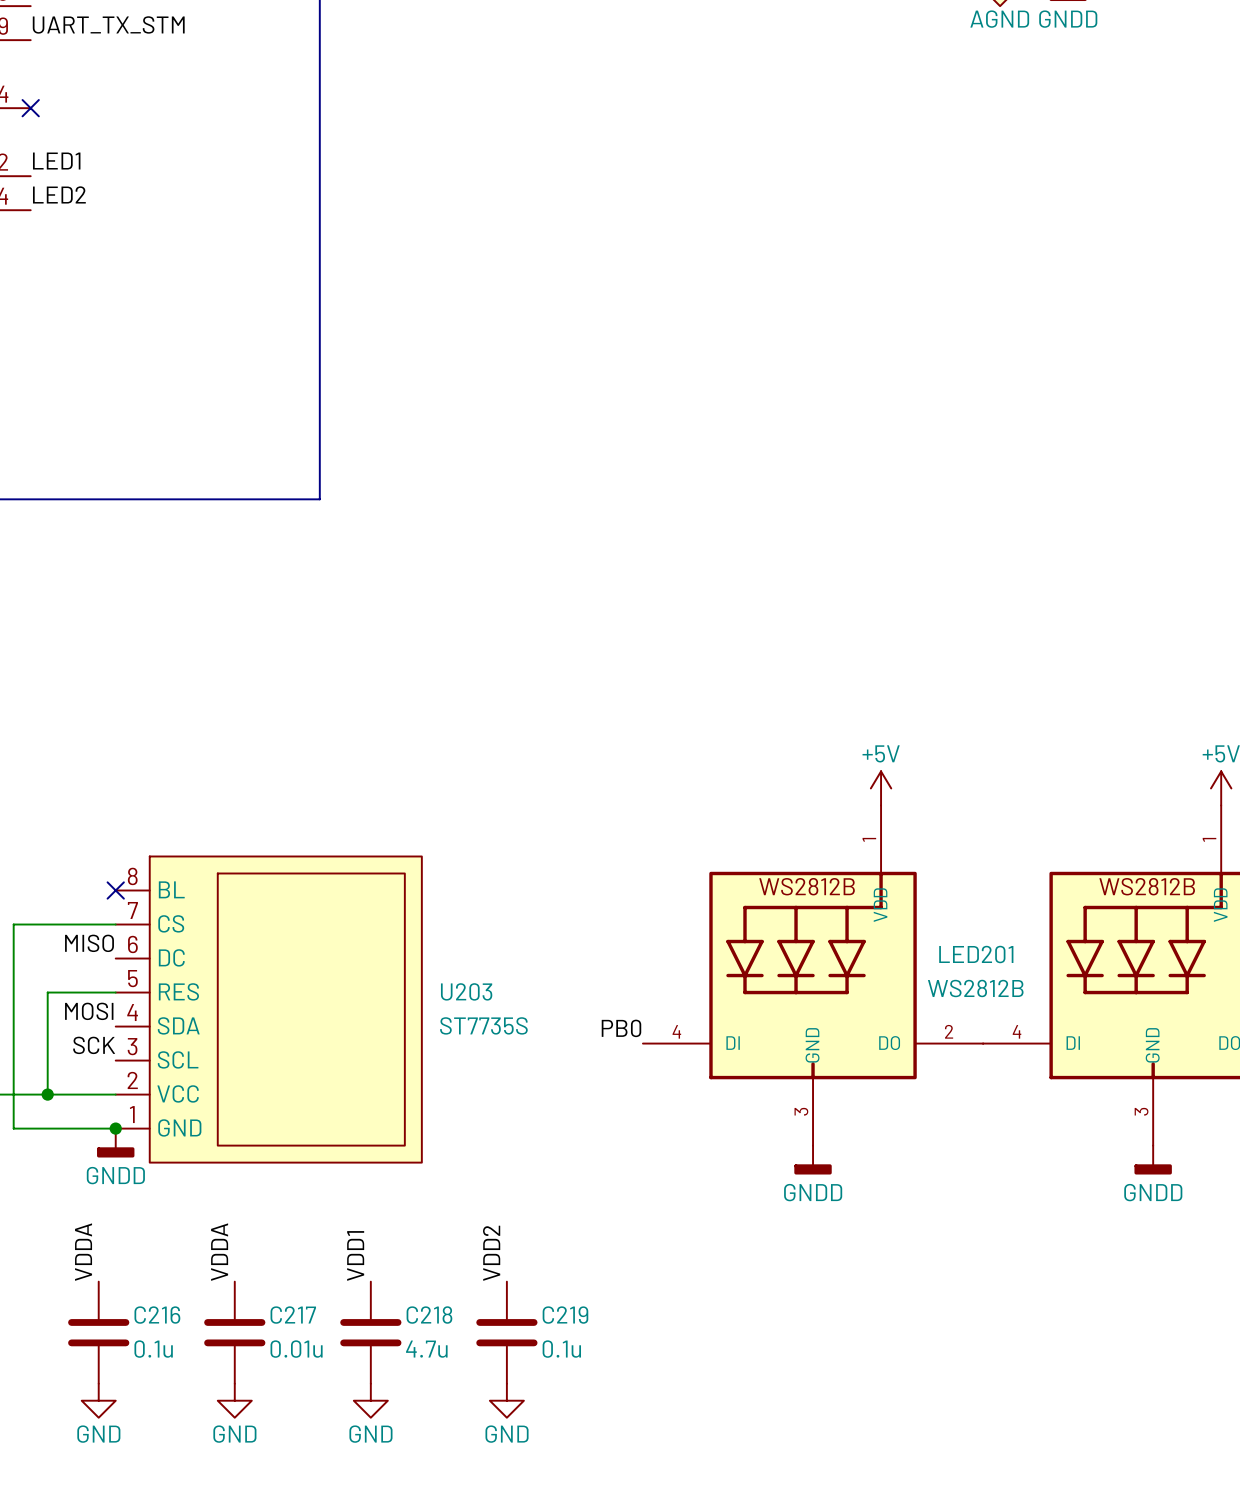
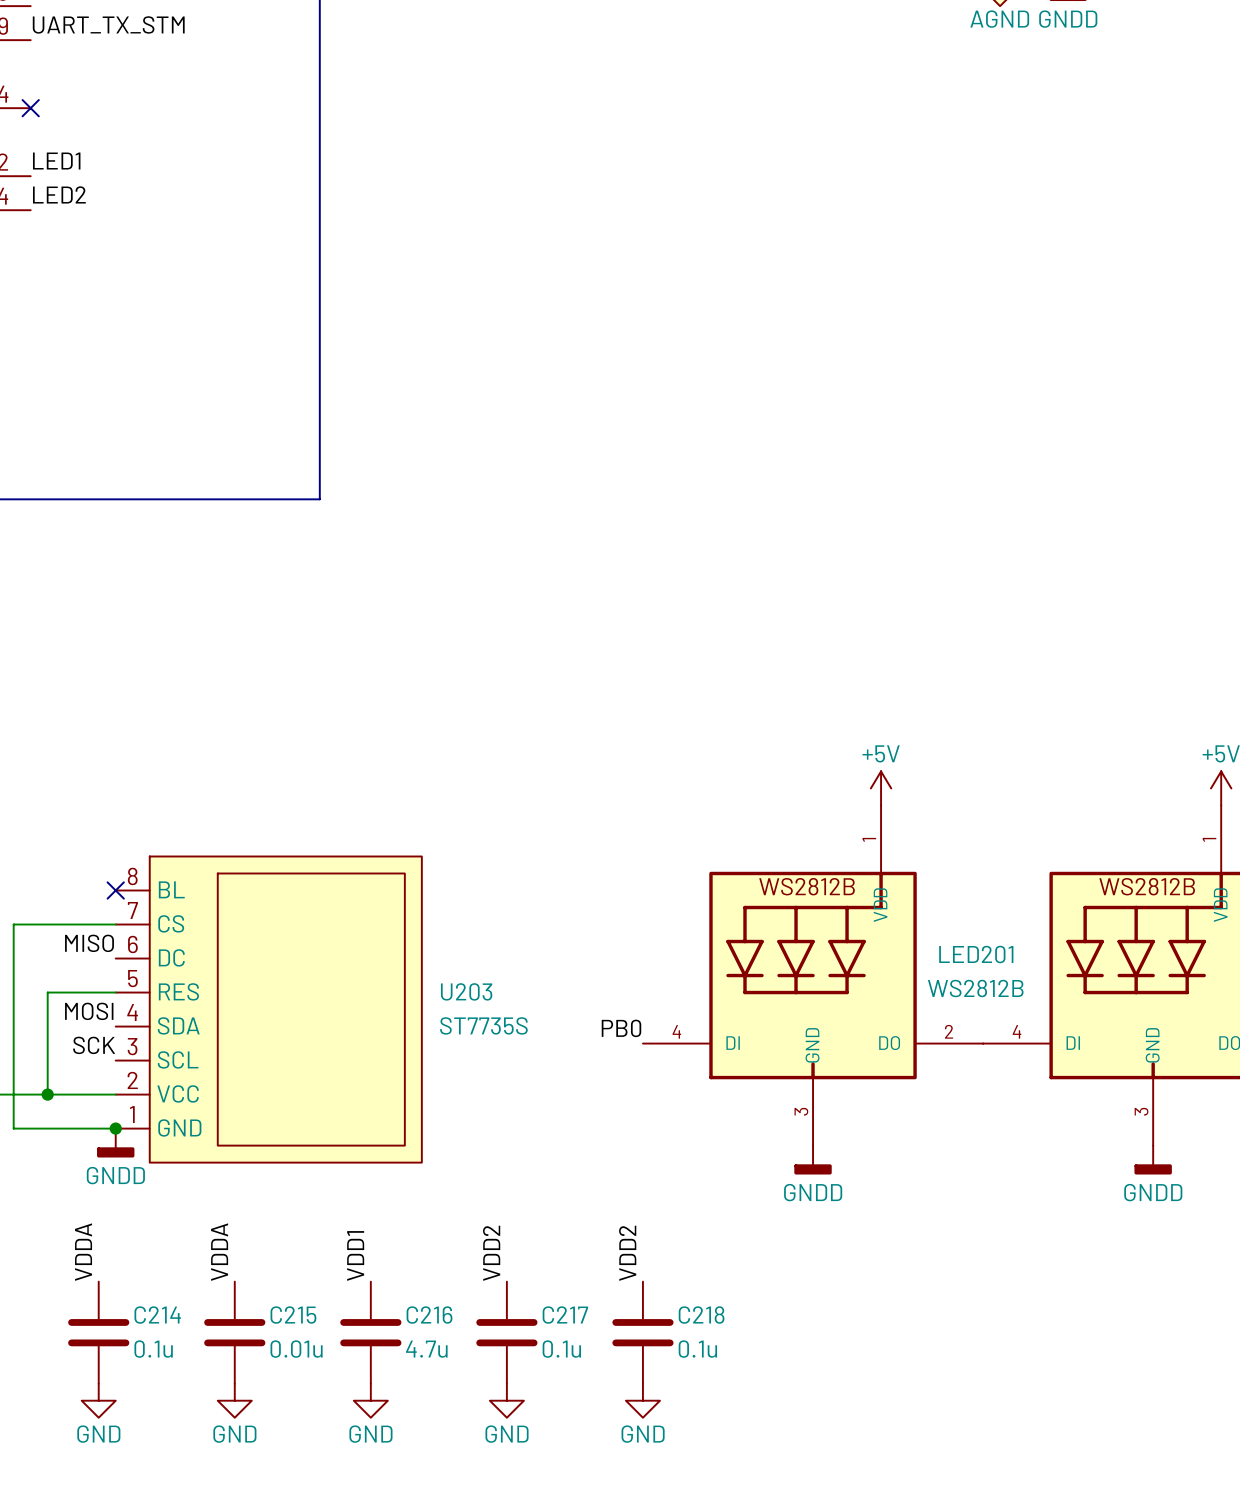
label: none -> VDD2 (627, 1253)
C216 name: C216 (157, 1315) -> C214 (157, 1315)
C217 name: C217 (293, 1315) -> C215 (293, 1315)
C218 name: C218 (429, 1315) -> C216 (429, 1315)
C219 name: C219 (565, 1315) -> C217 (565, 1315)
C218: none -> 0.1u (642, 1332)
power symbol: none -> GND (642, 1400)

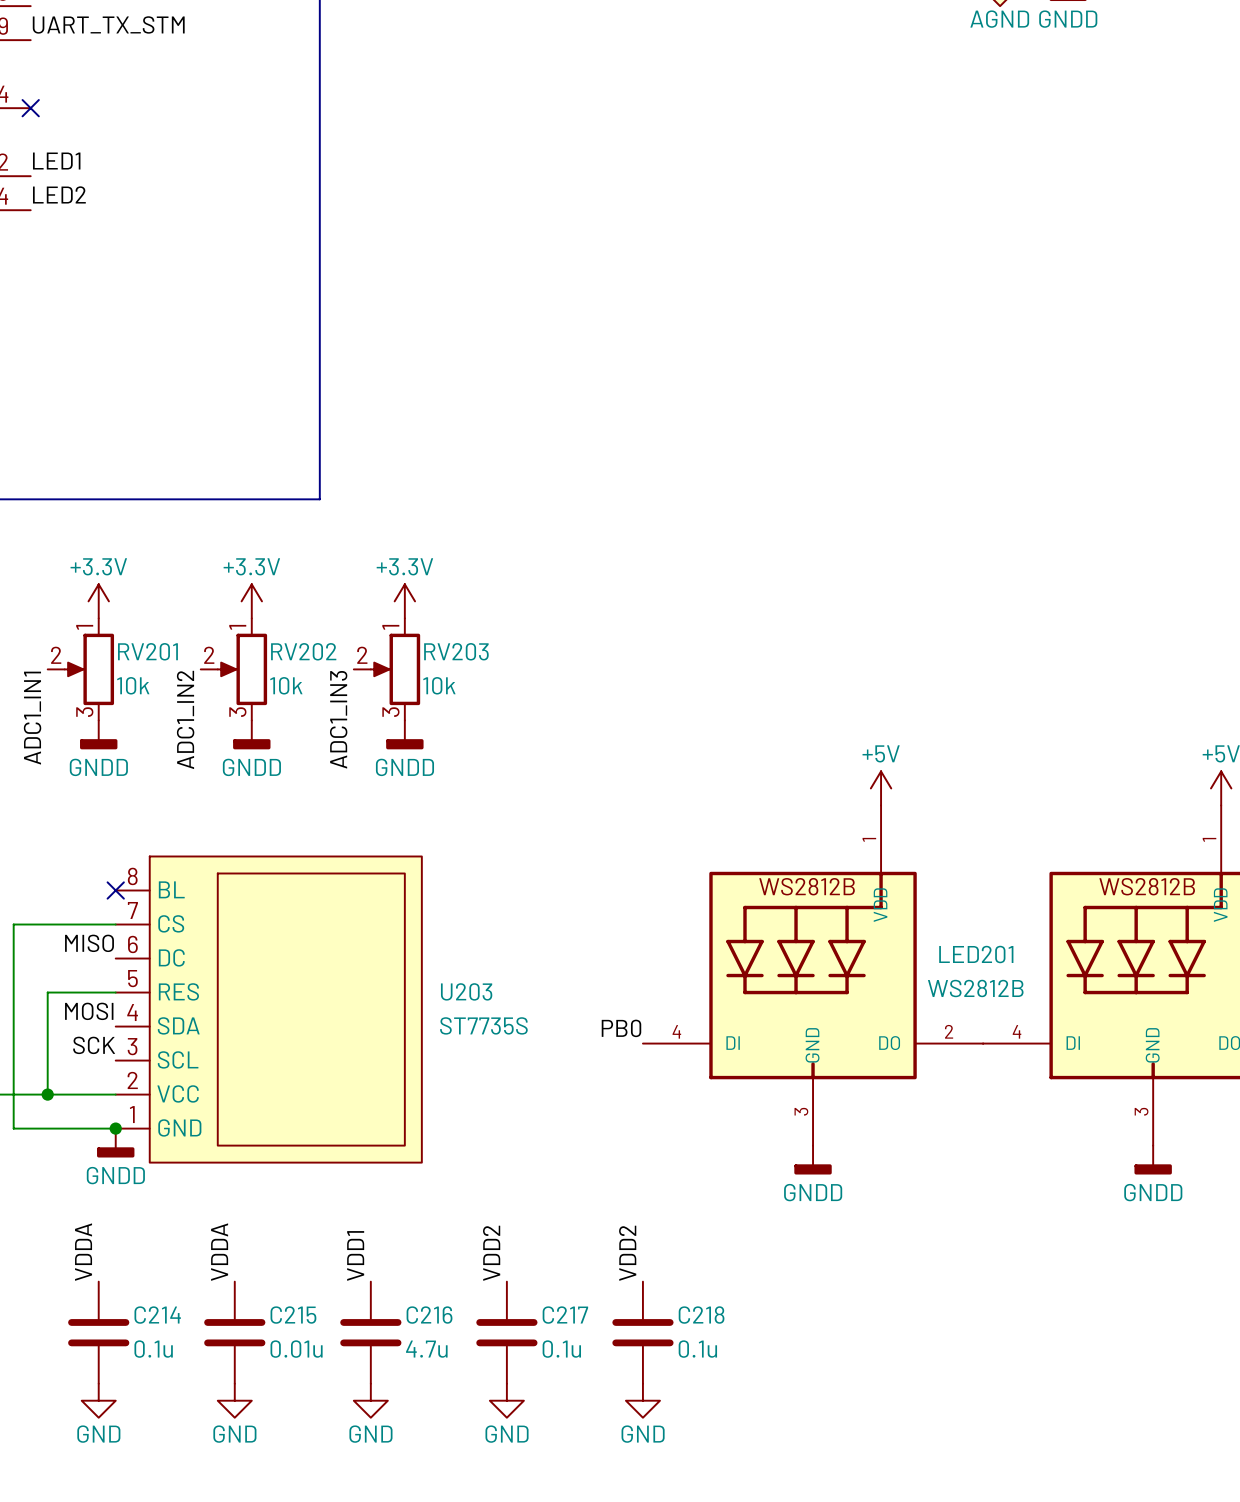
power symbol: none -> +3.3V (98, 601)
power symbol: none -> +3.3V (251, 601)
power symbol: none -> +3.3V (404, 601)
RV201: none -> 10k (80, 669)
RV202: none -> 10k (233, 669)
RV203: none -> 10k (386, 669)
label: none -> ADC1_IN1 (32, 718)
label: none -> ADC1_IN2 (185, 719)
label: none -> ADC1_IN3 (338, 719)
power symbol: none -> GNDD (98, 734)
power symbol: none -> GNDD (251, 734)
power symbol: none -> GNDD (404, 734)

